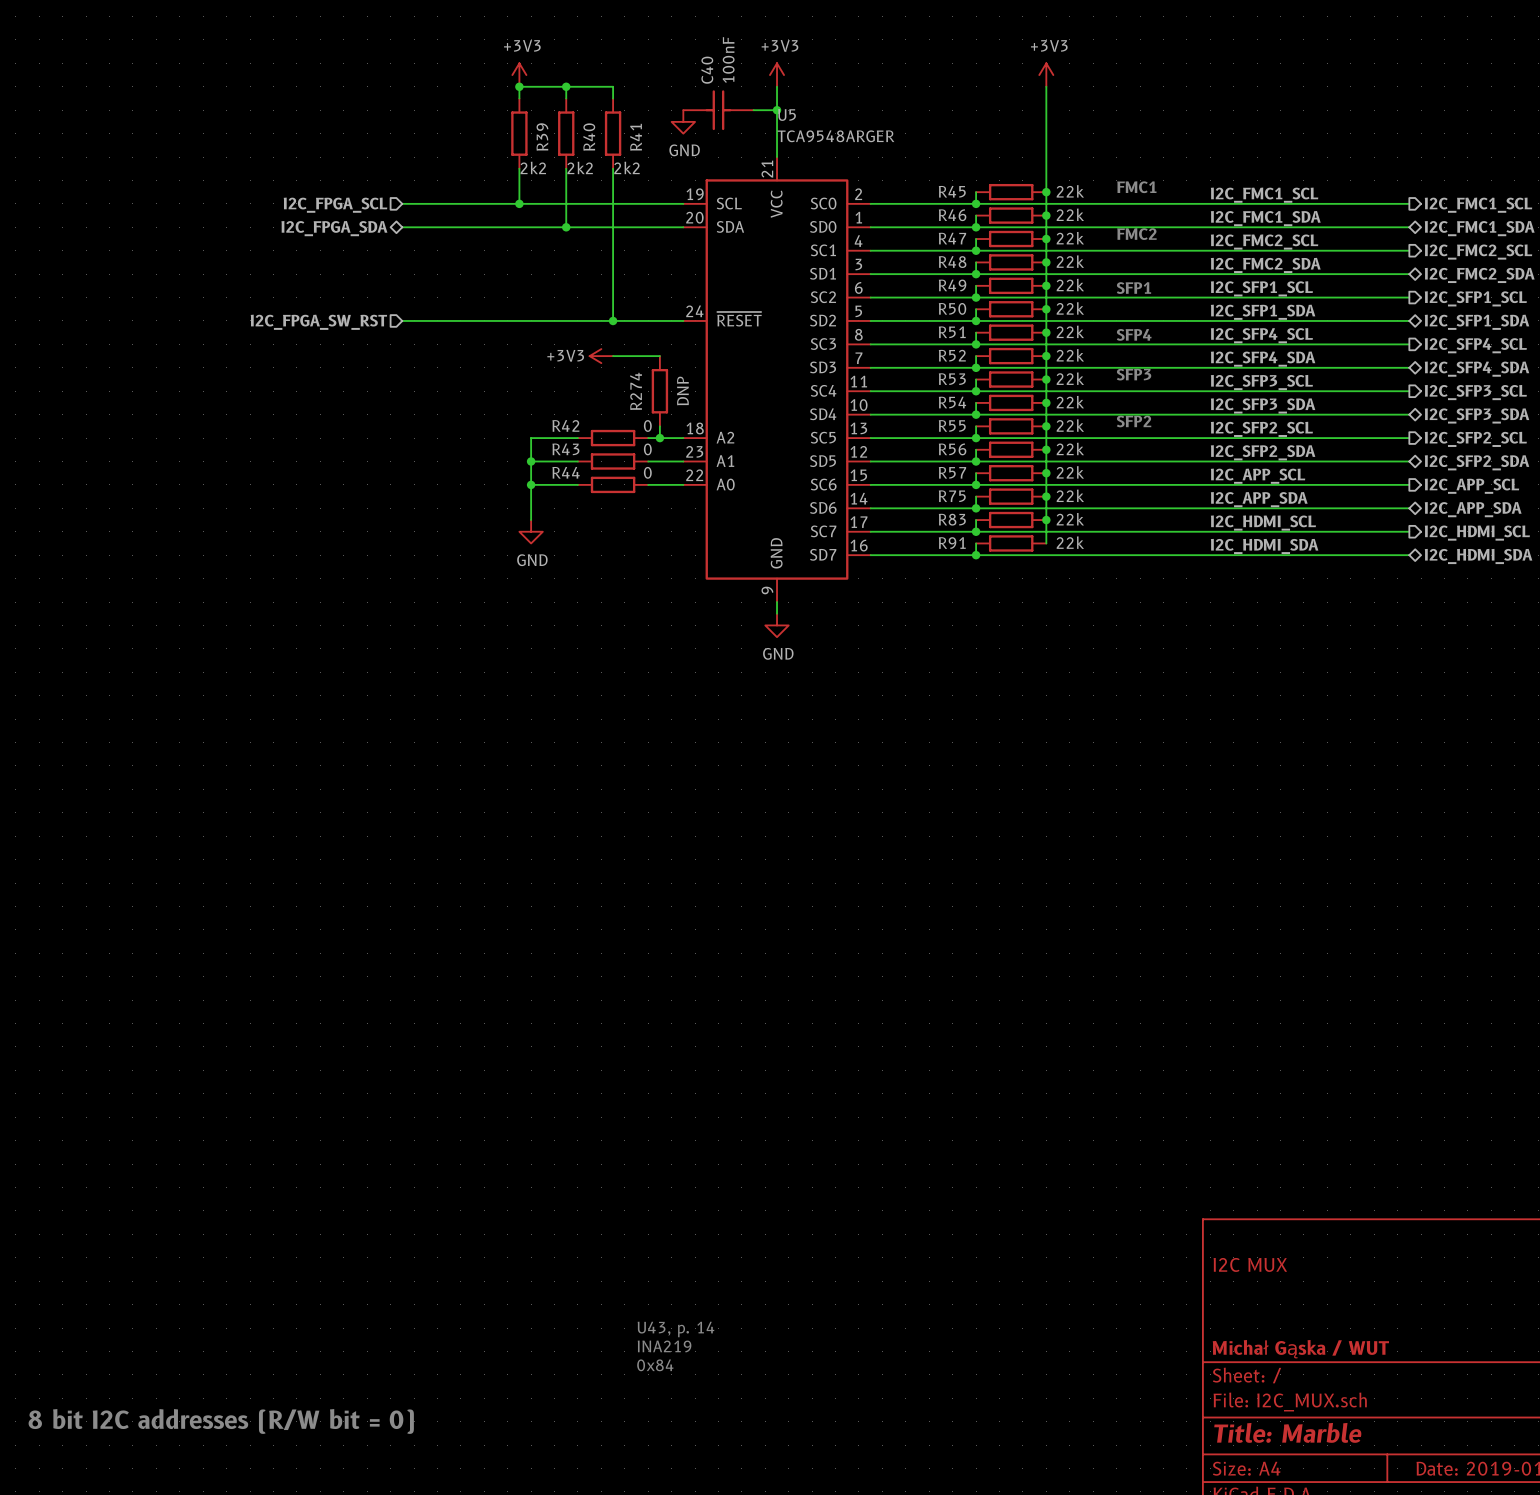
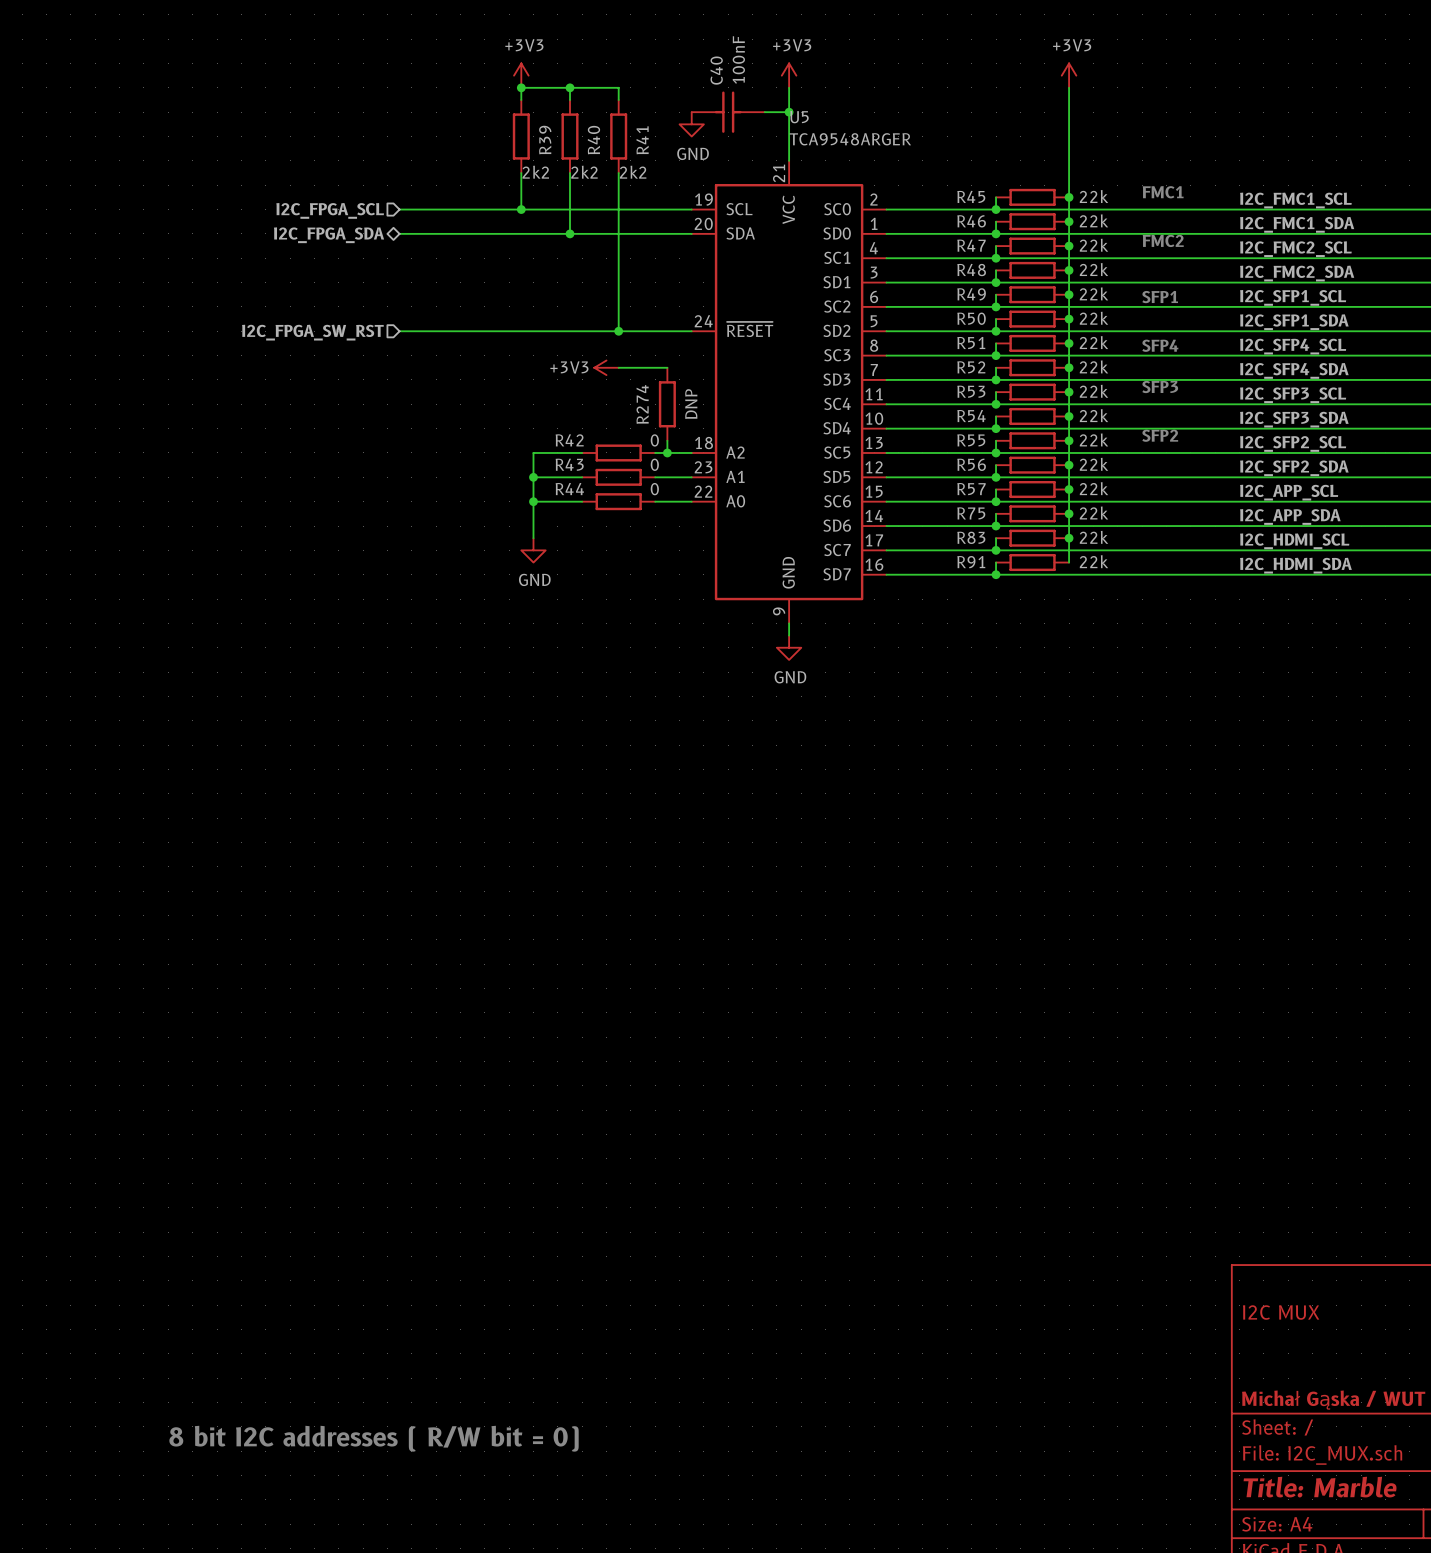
text: U43, p. 14 (675, 1329) -> none
text: INA219 (664, 1346) -> none
text: 0x84 (655, 1365) -> none
text: 8 bit I2C addresses (R/W bit = 0) (221, 1421) -> 8 bit I2C addresses ( R/W bit = 0) (374, 1438)

